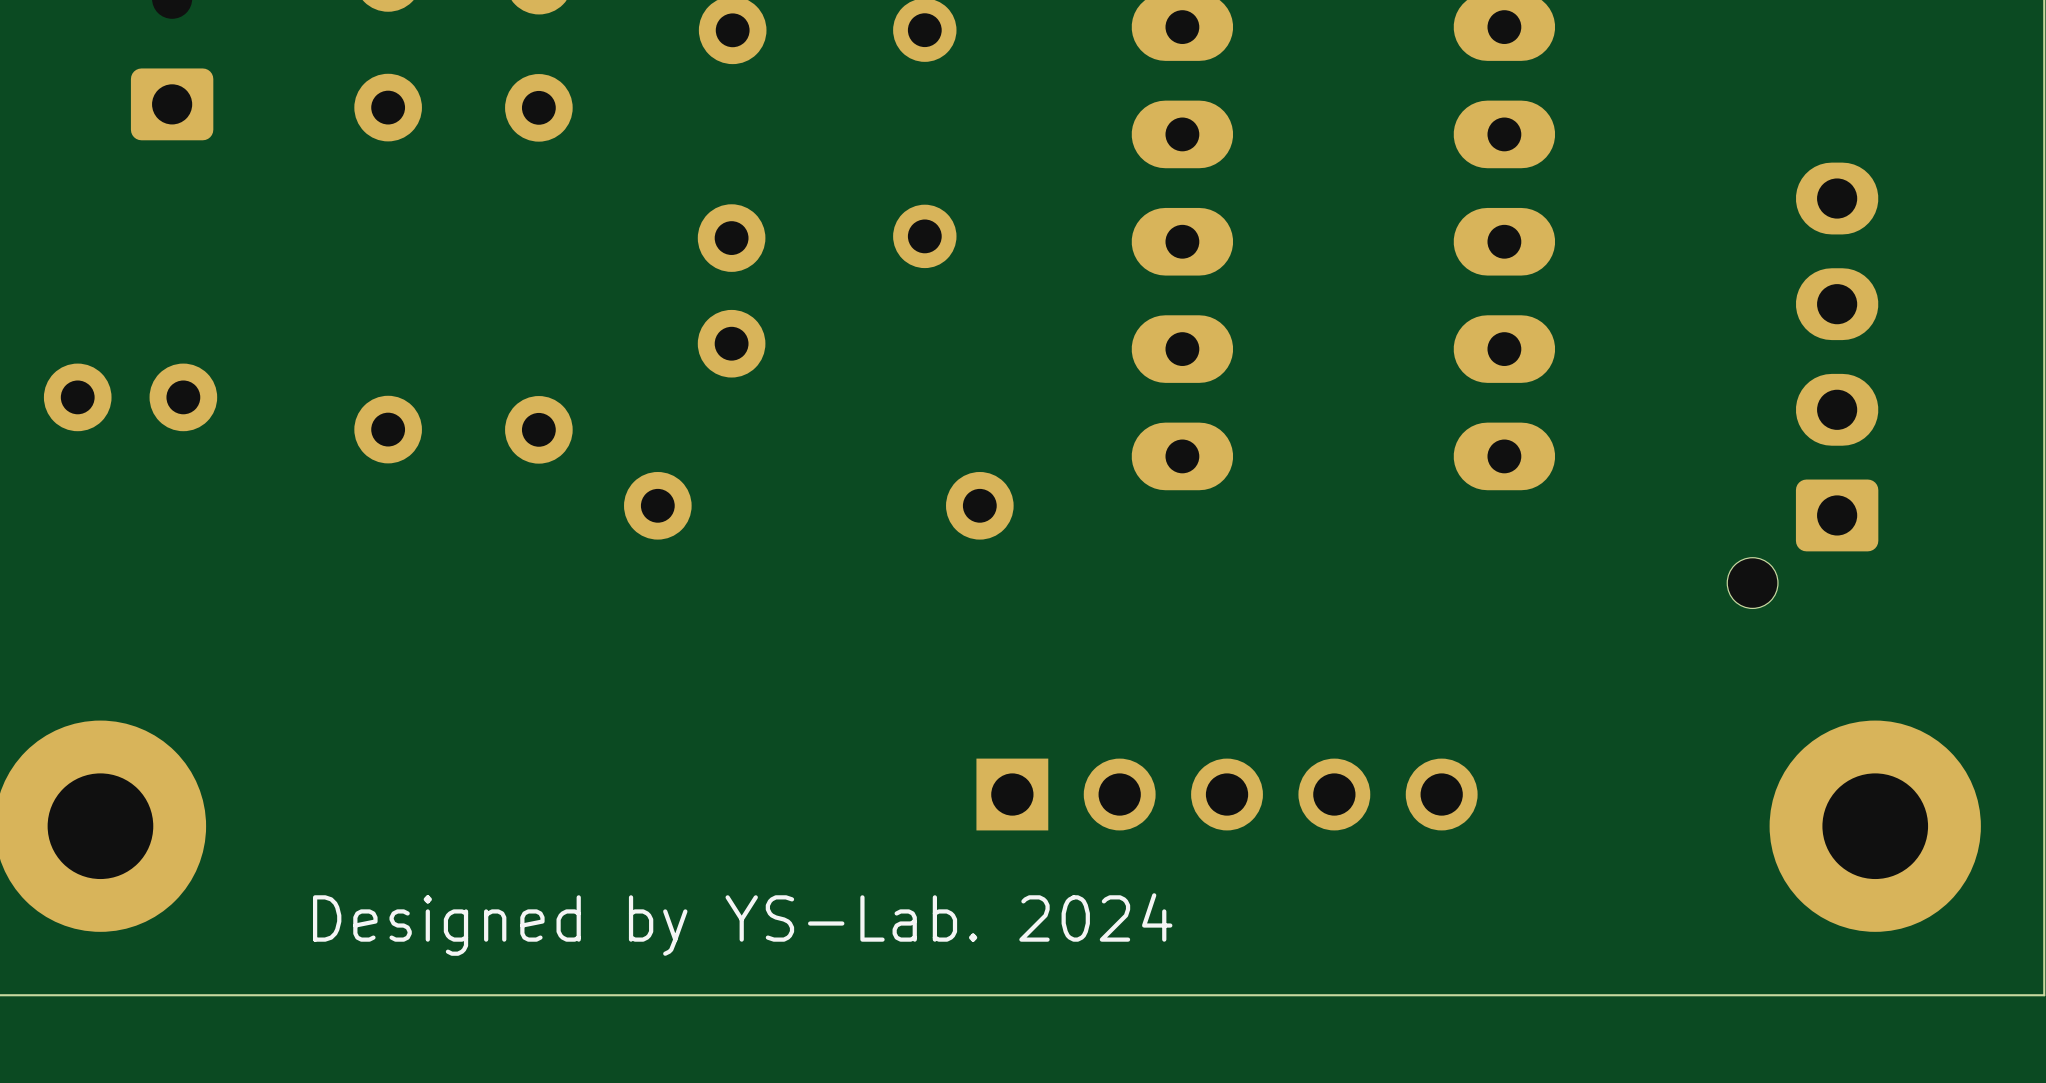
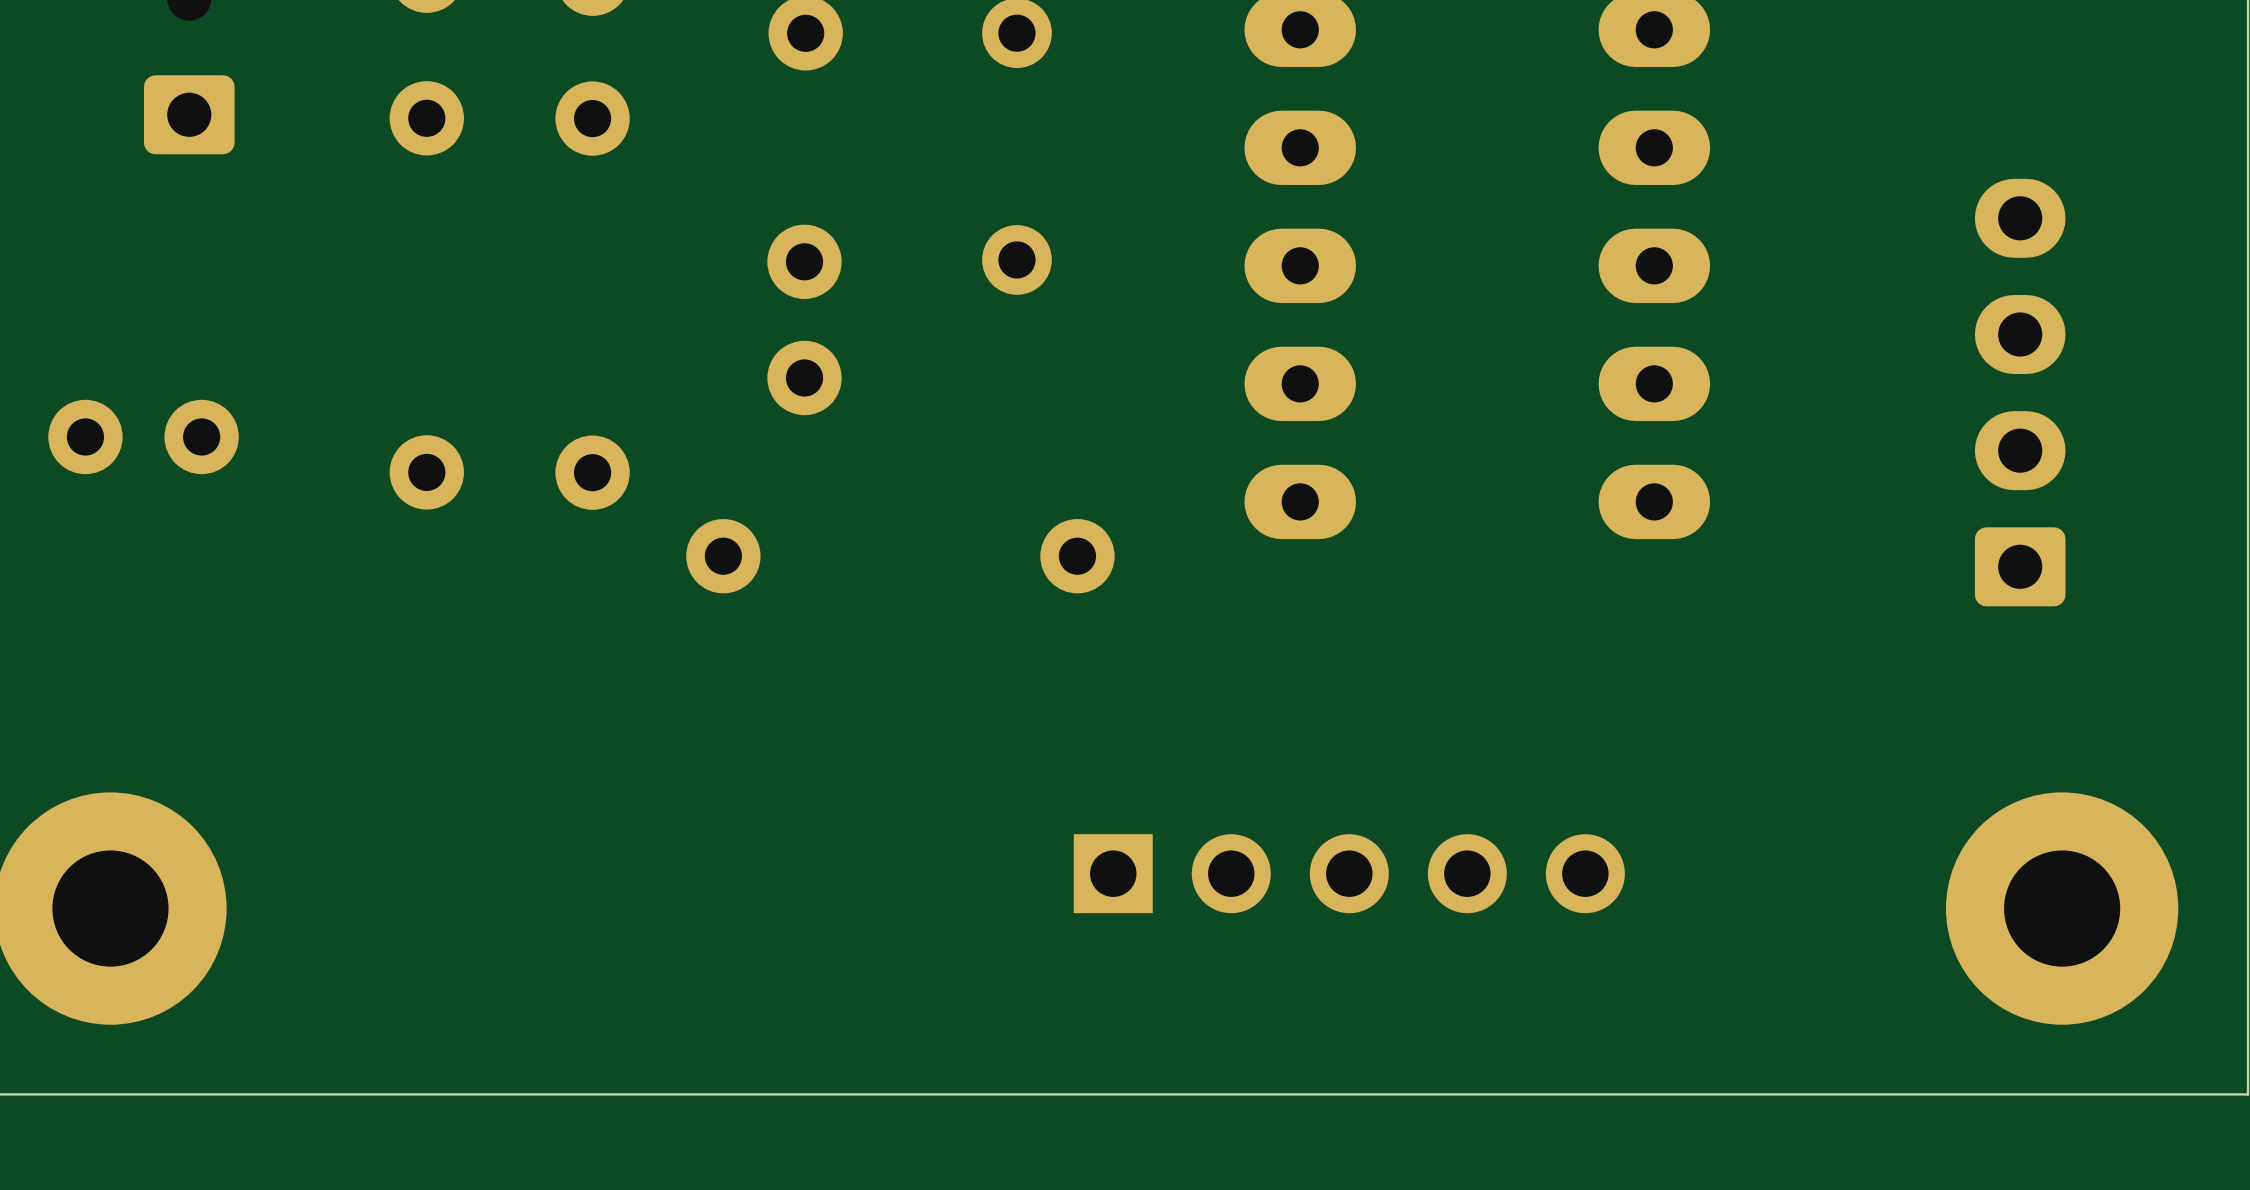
part: (1802, 385) -> none
text: Designed by YS-Lab. 2024 (742, 924) -> none

